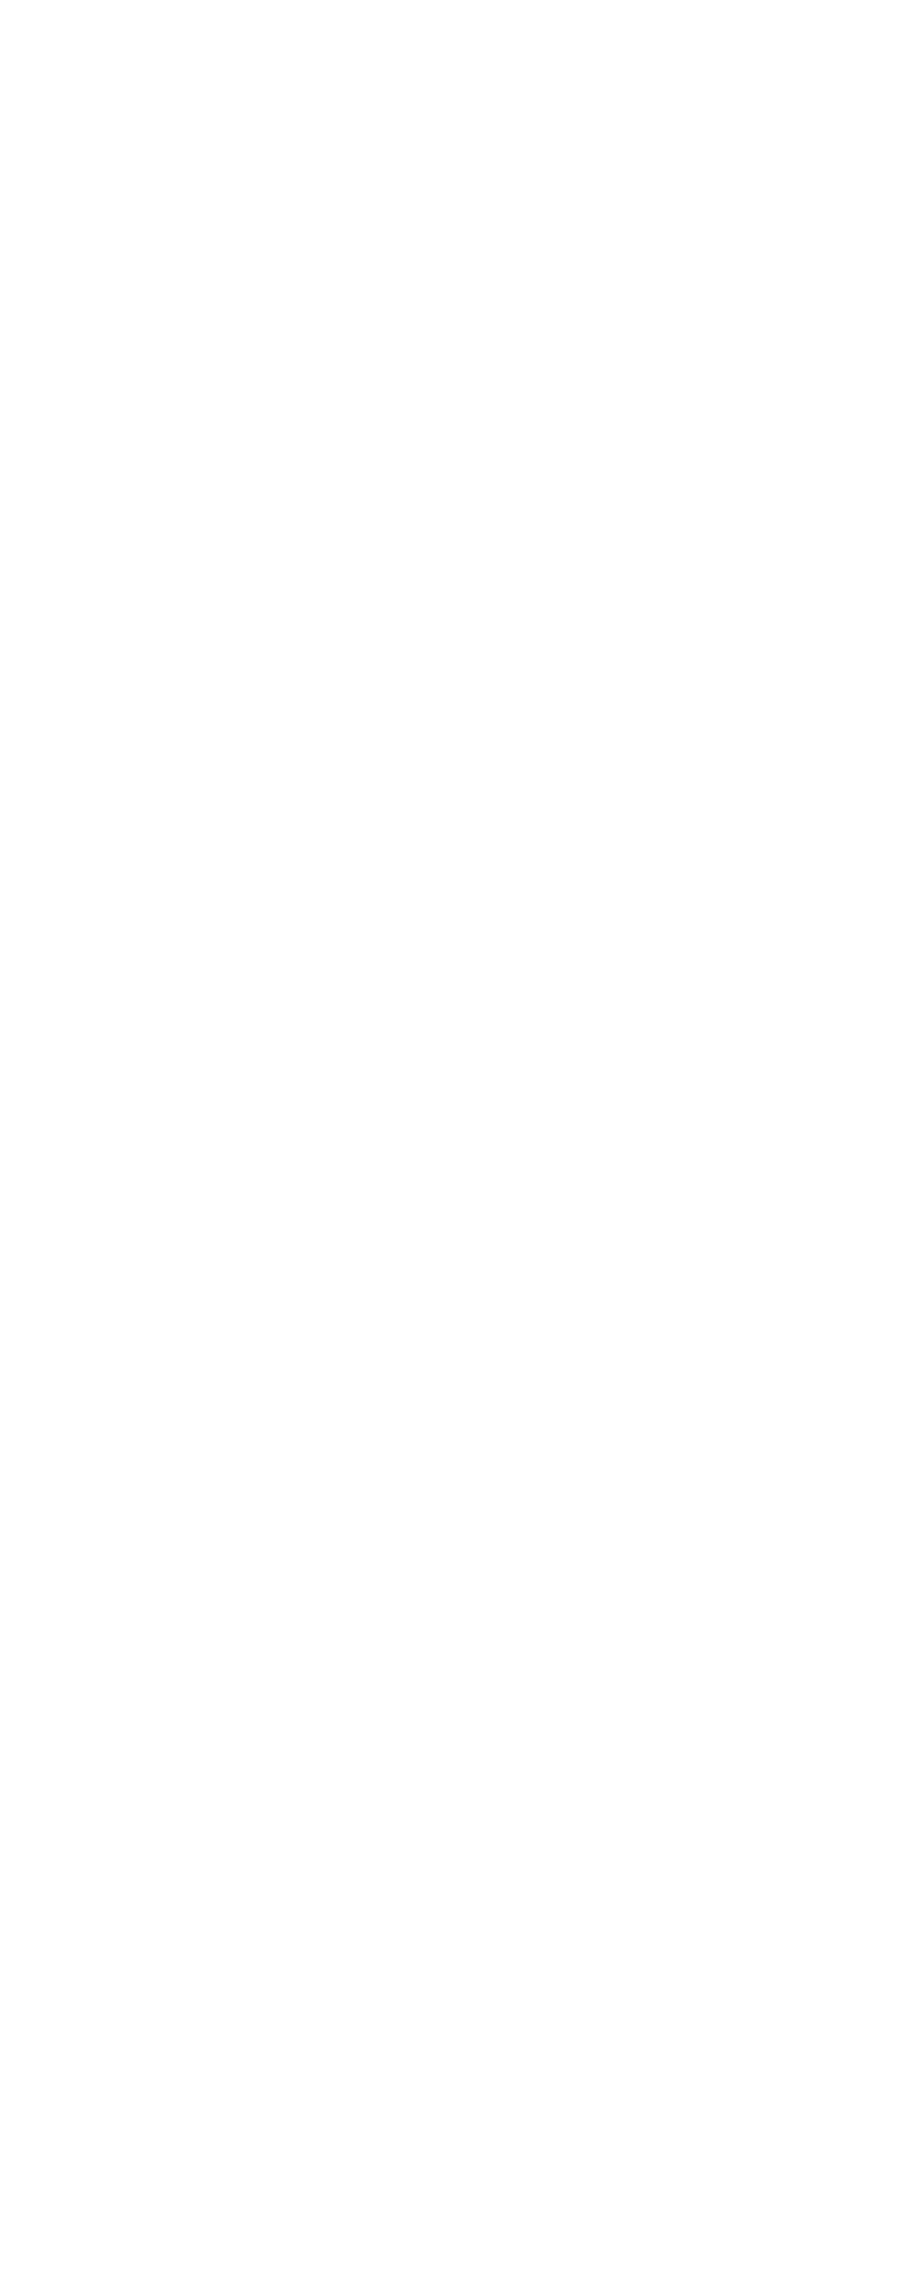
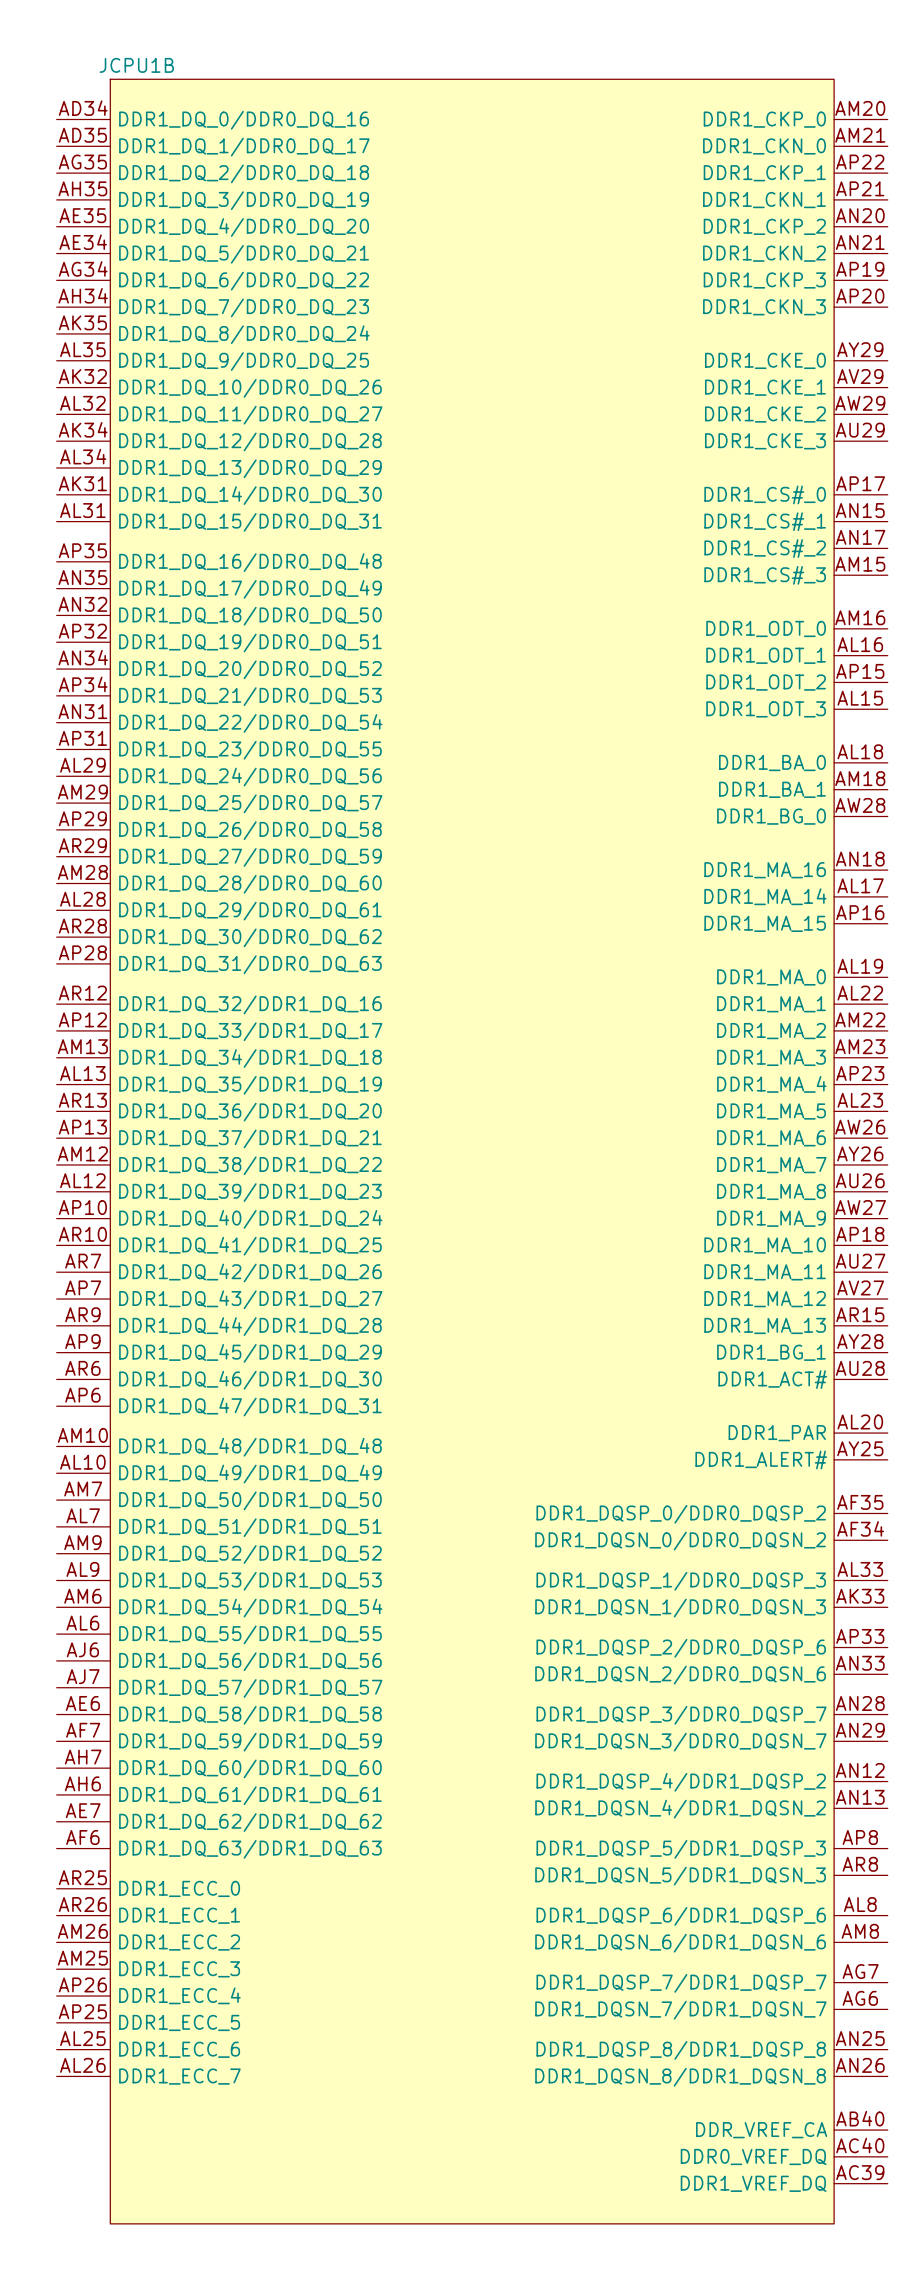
JCPU1B: none -> (472, 1151)

